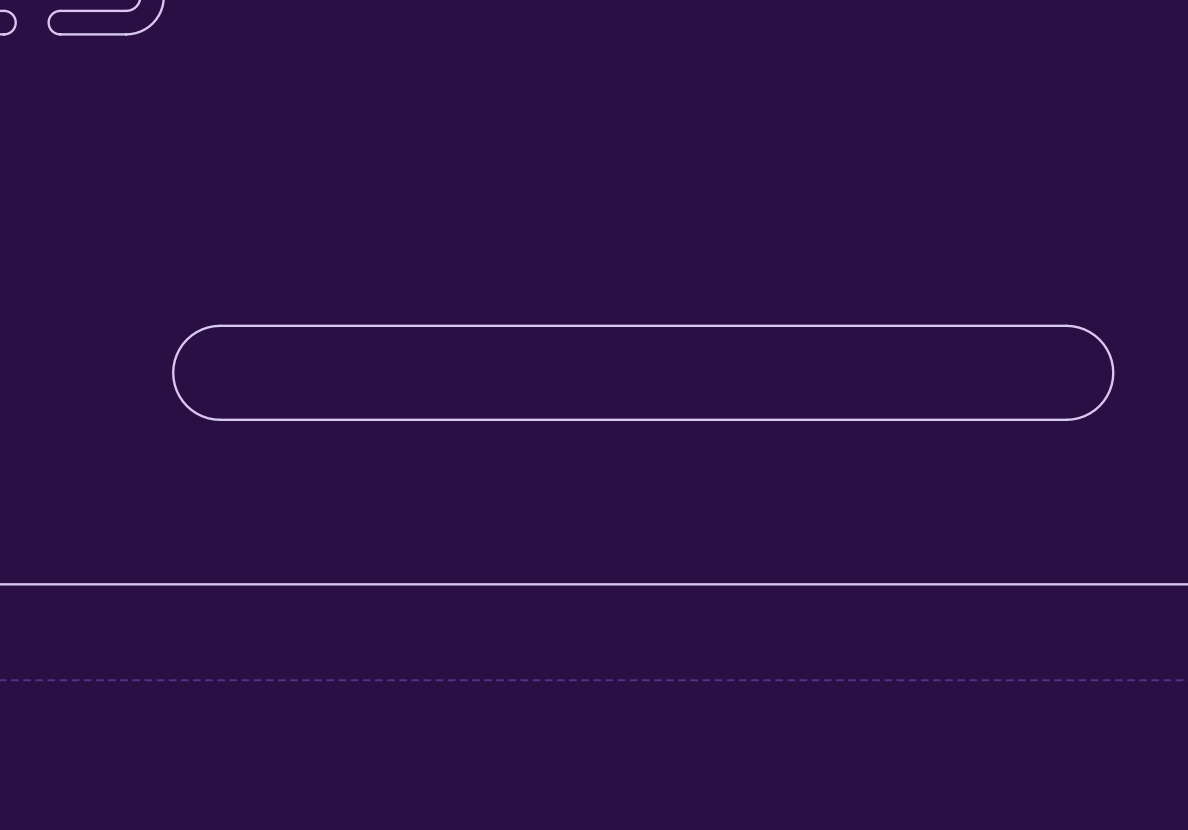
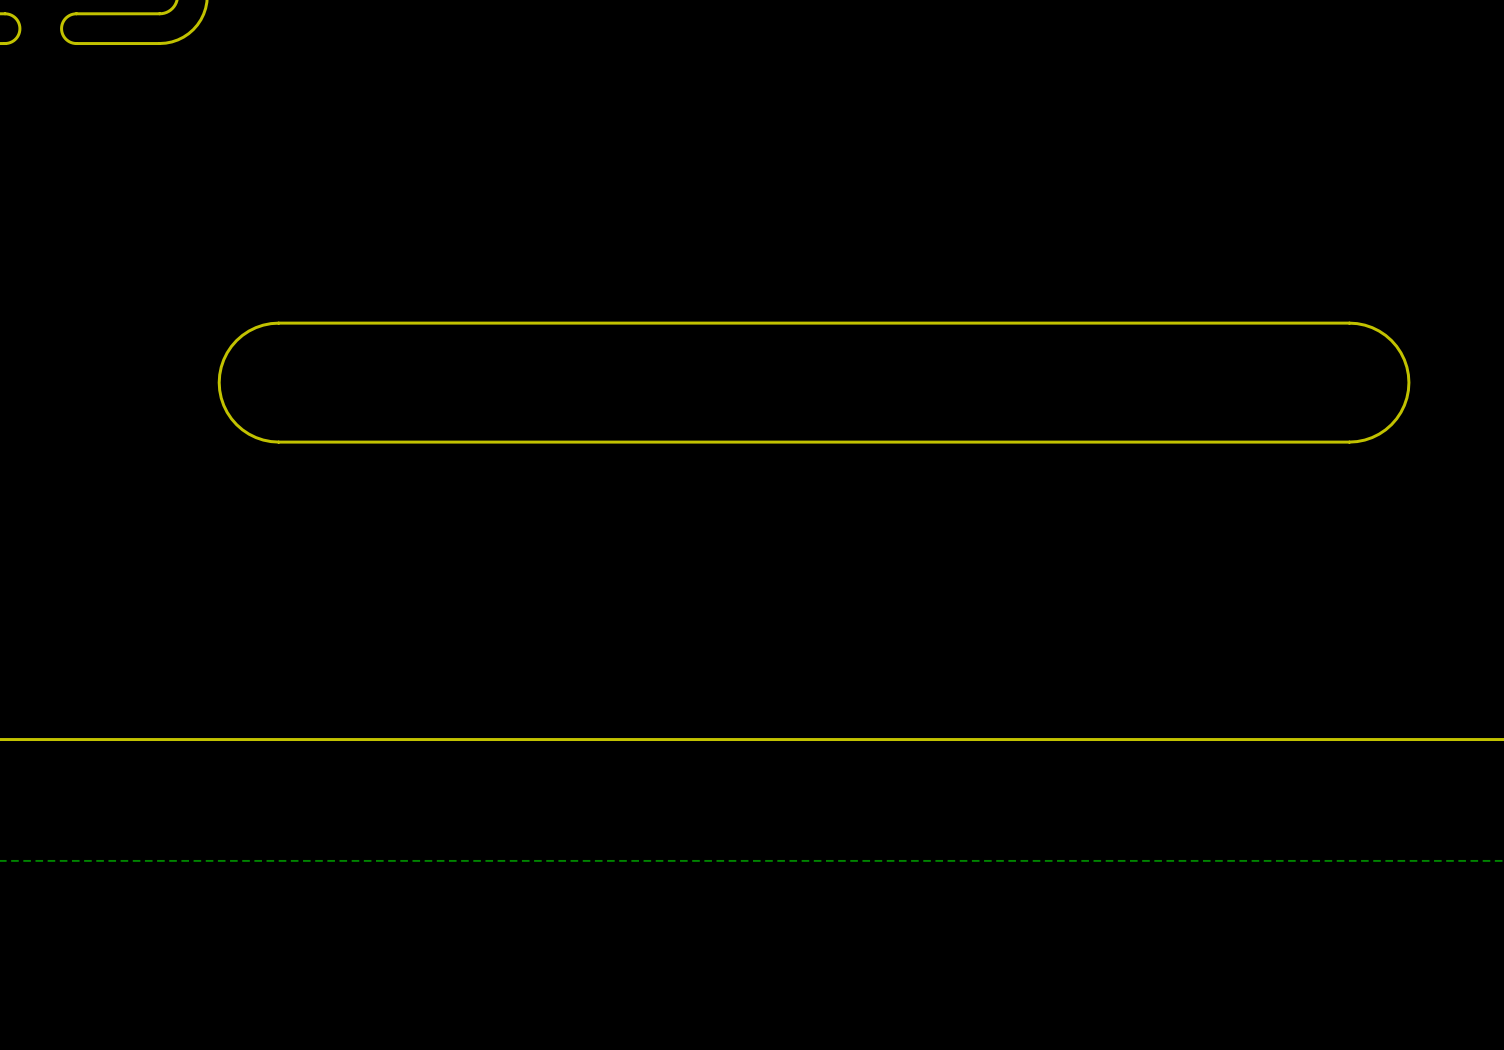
board edge: (1066, 325) (220, 325) (202, 329) (186, 339) (176, 354) (173, 372) (176, 390) (186, 406) (202, 416) (220, 419) (1066, 419) (1084, 416) (1099, 406) (1109, 390) (1113, 372) (1109, 354) (1099, 339) (1084, 329) (1066, 325) -> (1349, 323) (278, 323) (255, 327) (236, 340) (223, 359) (219, 382) (223, 405) (236, 424) (255, 437) (278, 442) (1349, 442) (1372, 437) (1391, 424) (1404, 405) (1408, 382) (1404, 359) (1391, 340) (1372, 327) (1349, 323)

